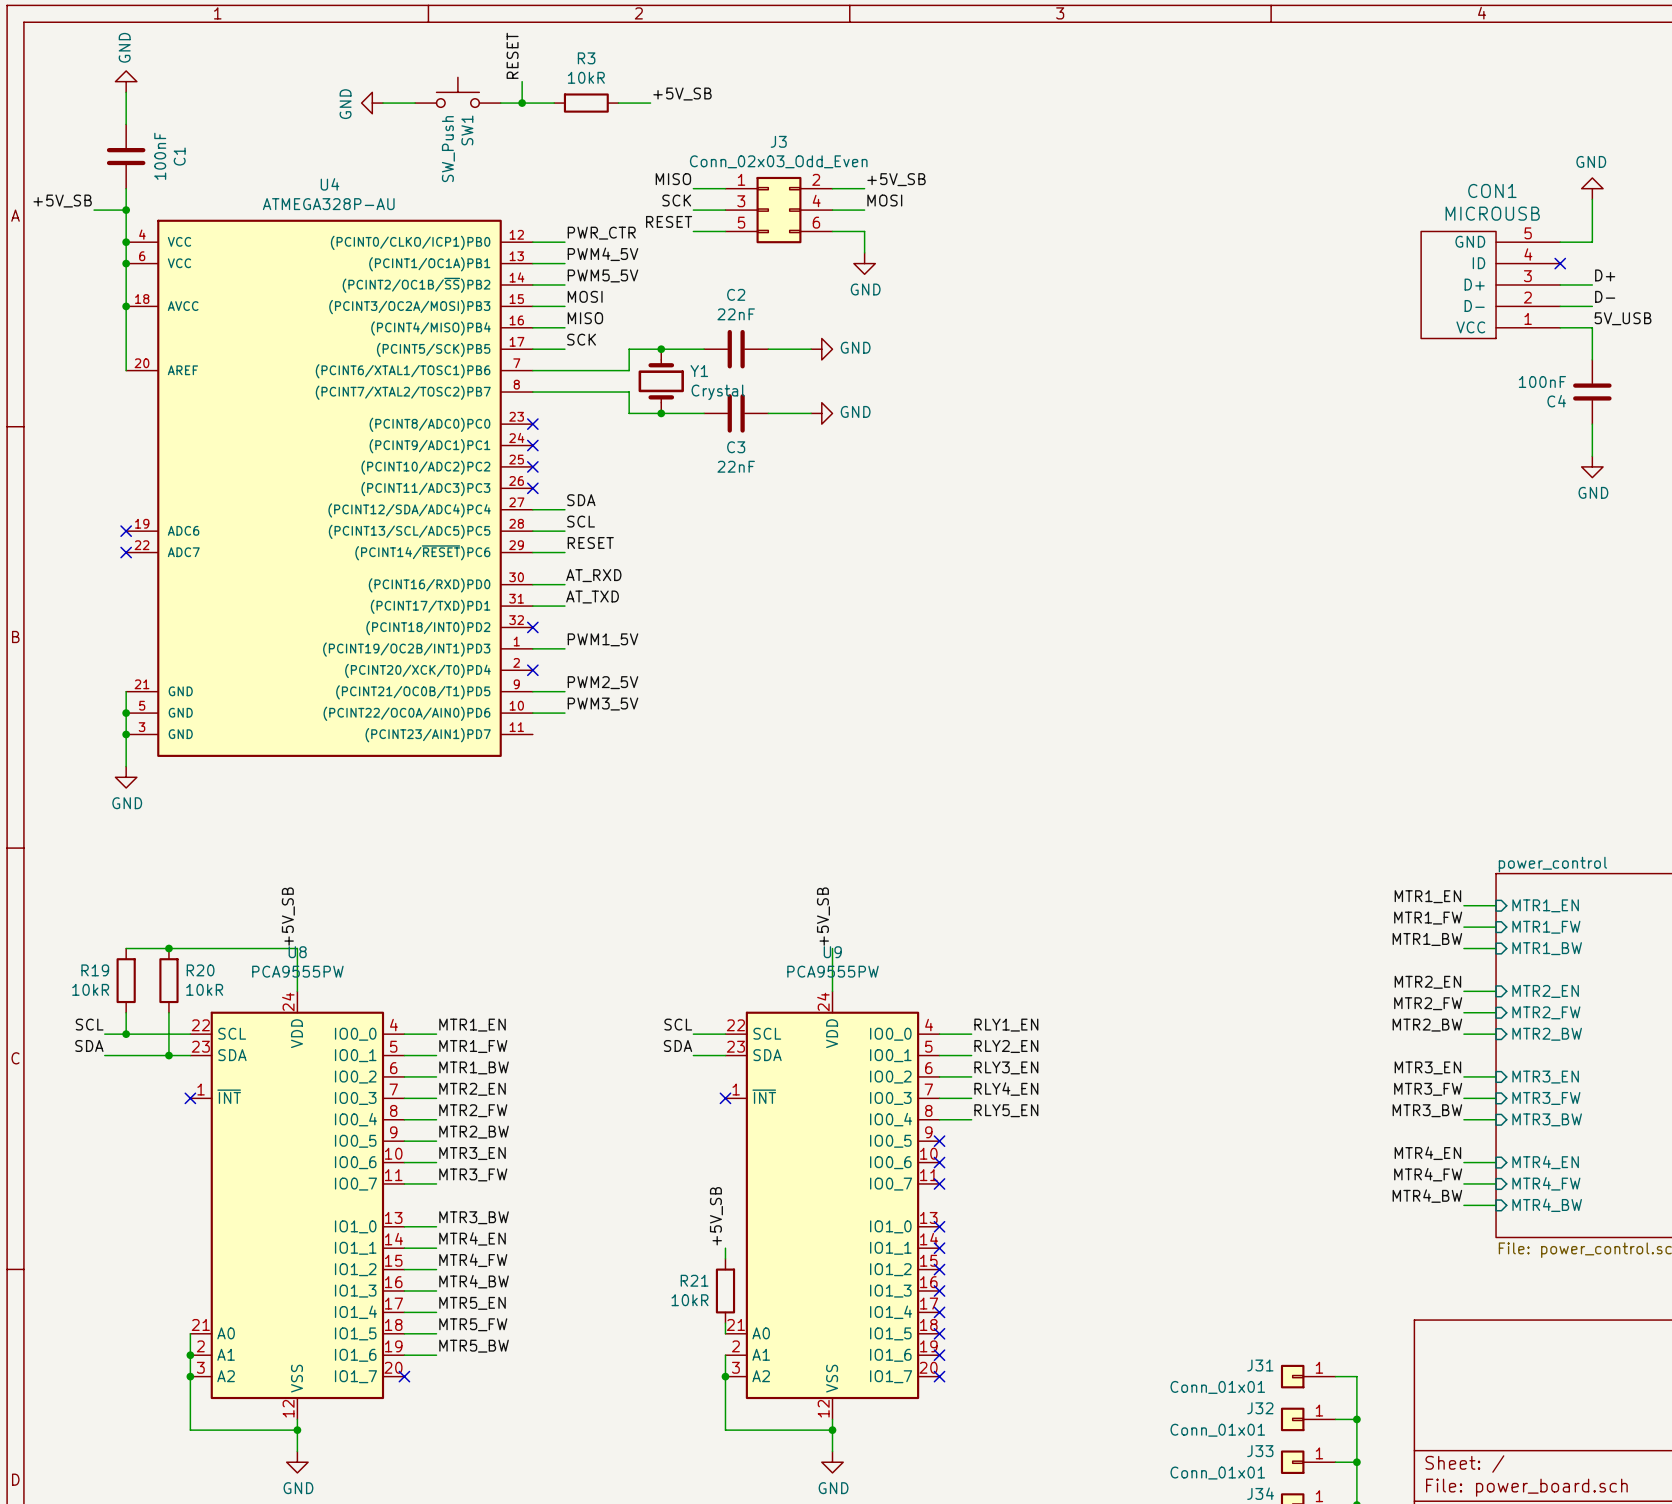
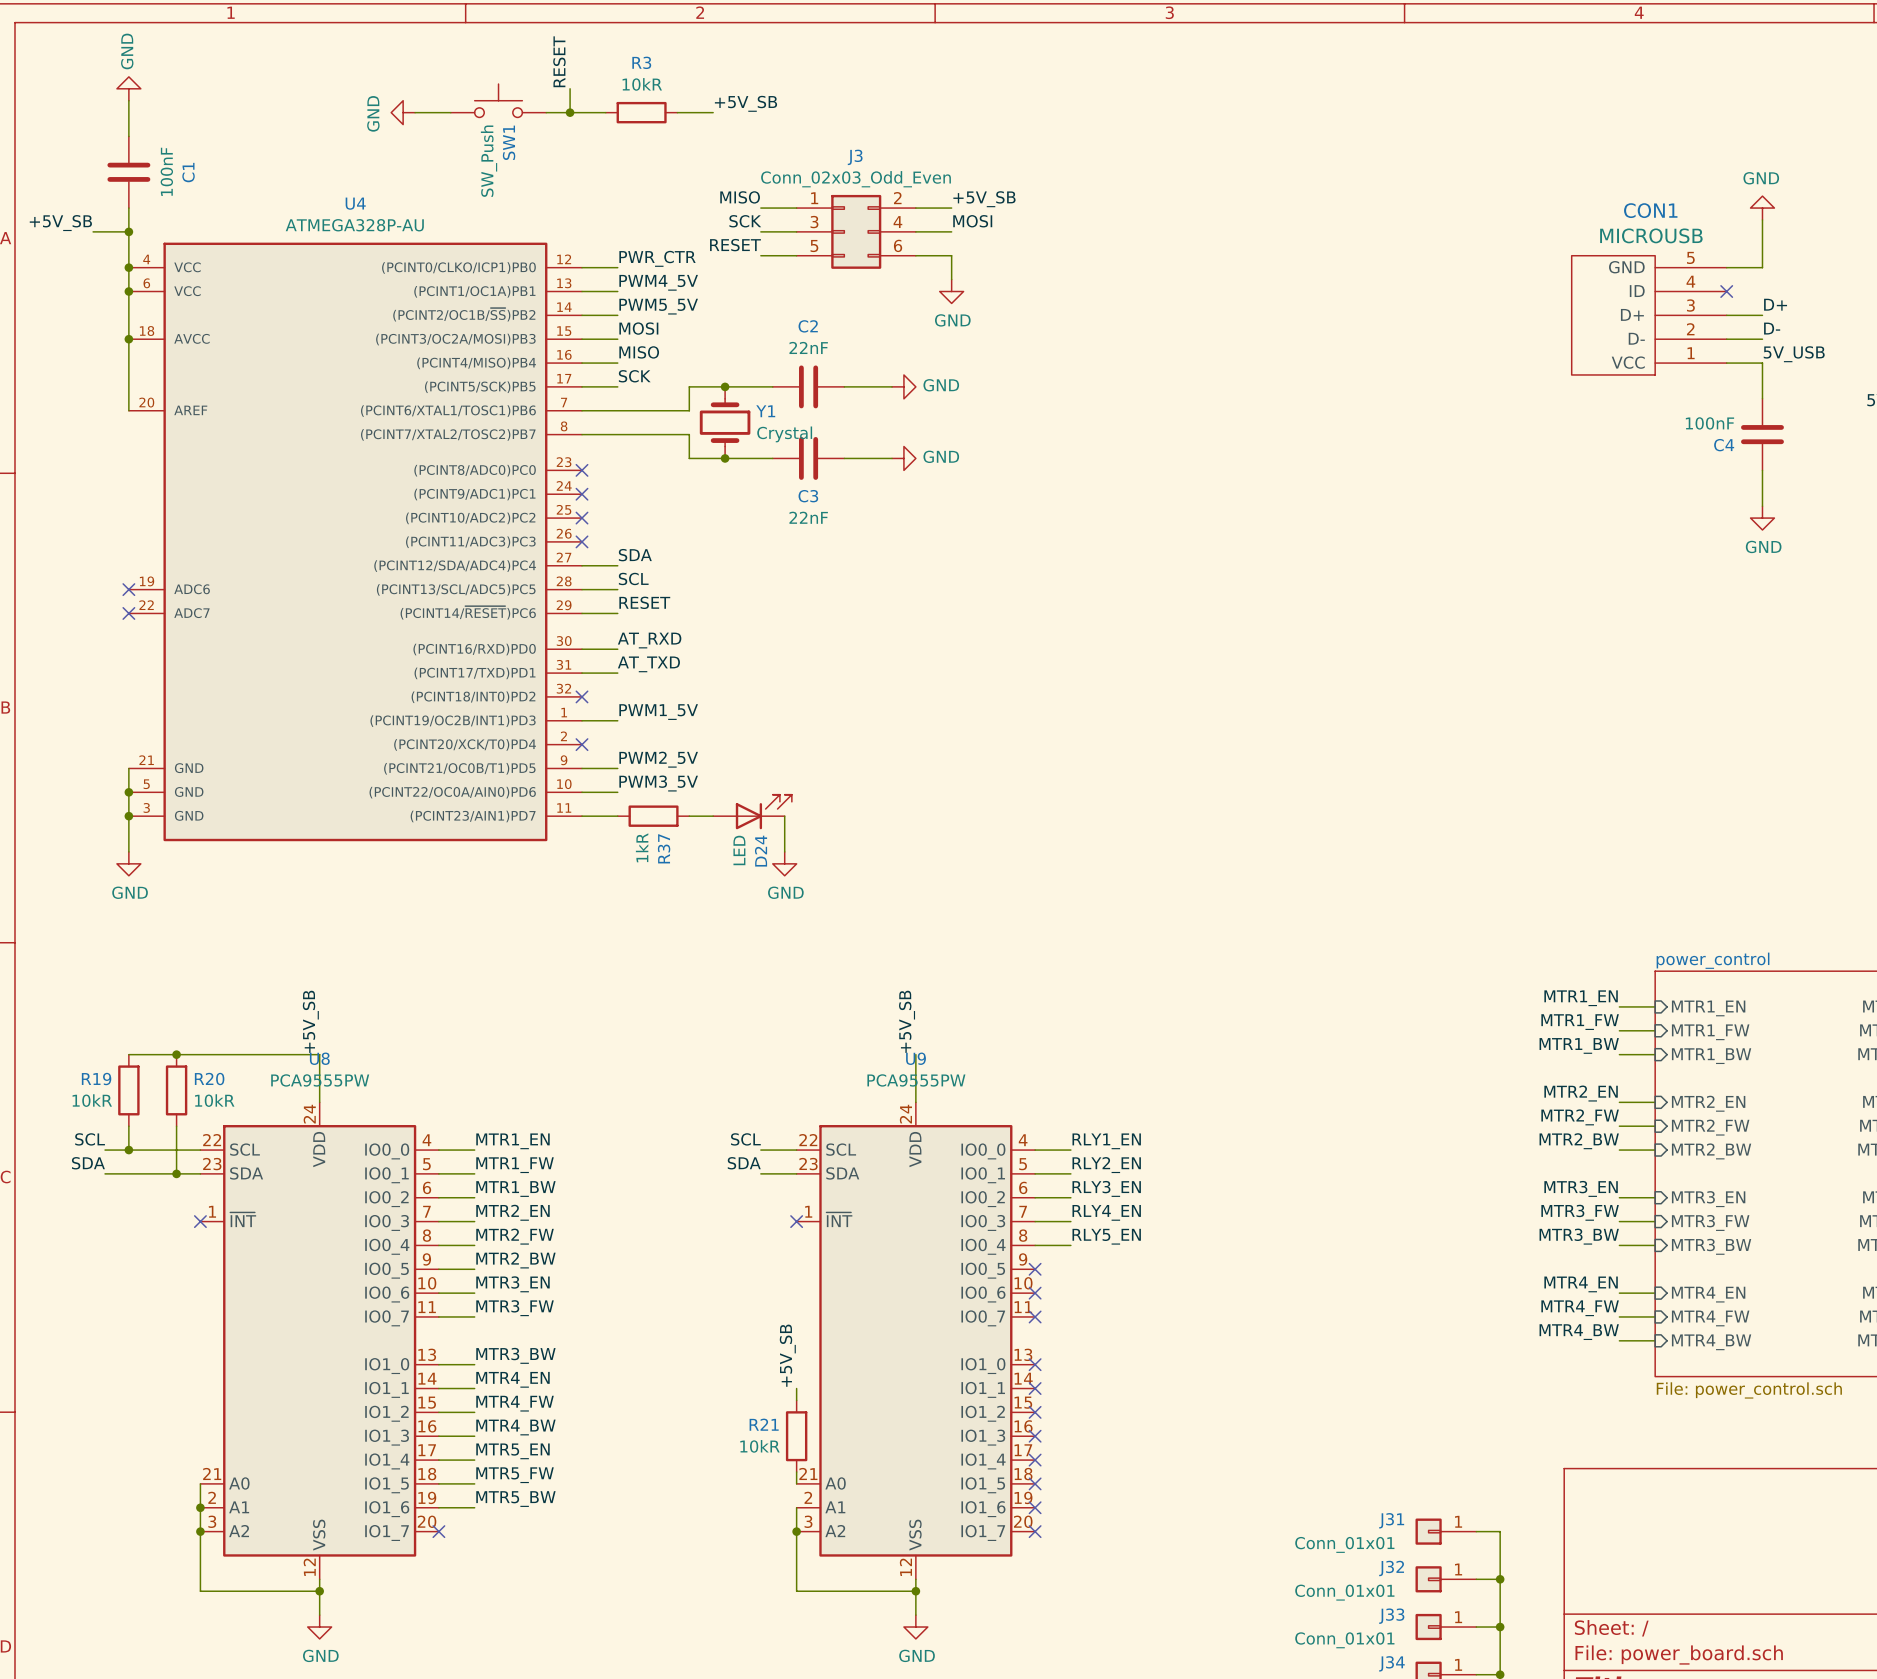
D24: none -> LED (752, 812)
wire: none -> (581, 816) (617, 816)
R37: none -> 1kR (653, 816)
wire: none -> (689, 816) (713, 816)
wire: none -> (784, 816) (784, 851)
power symbol: none -> GND (784, 863)

